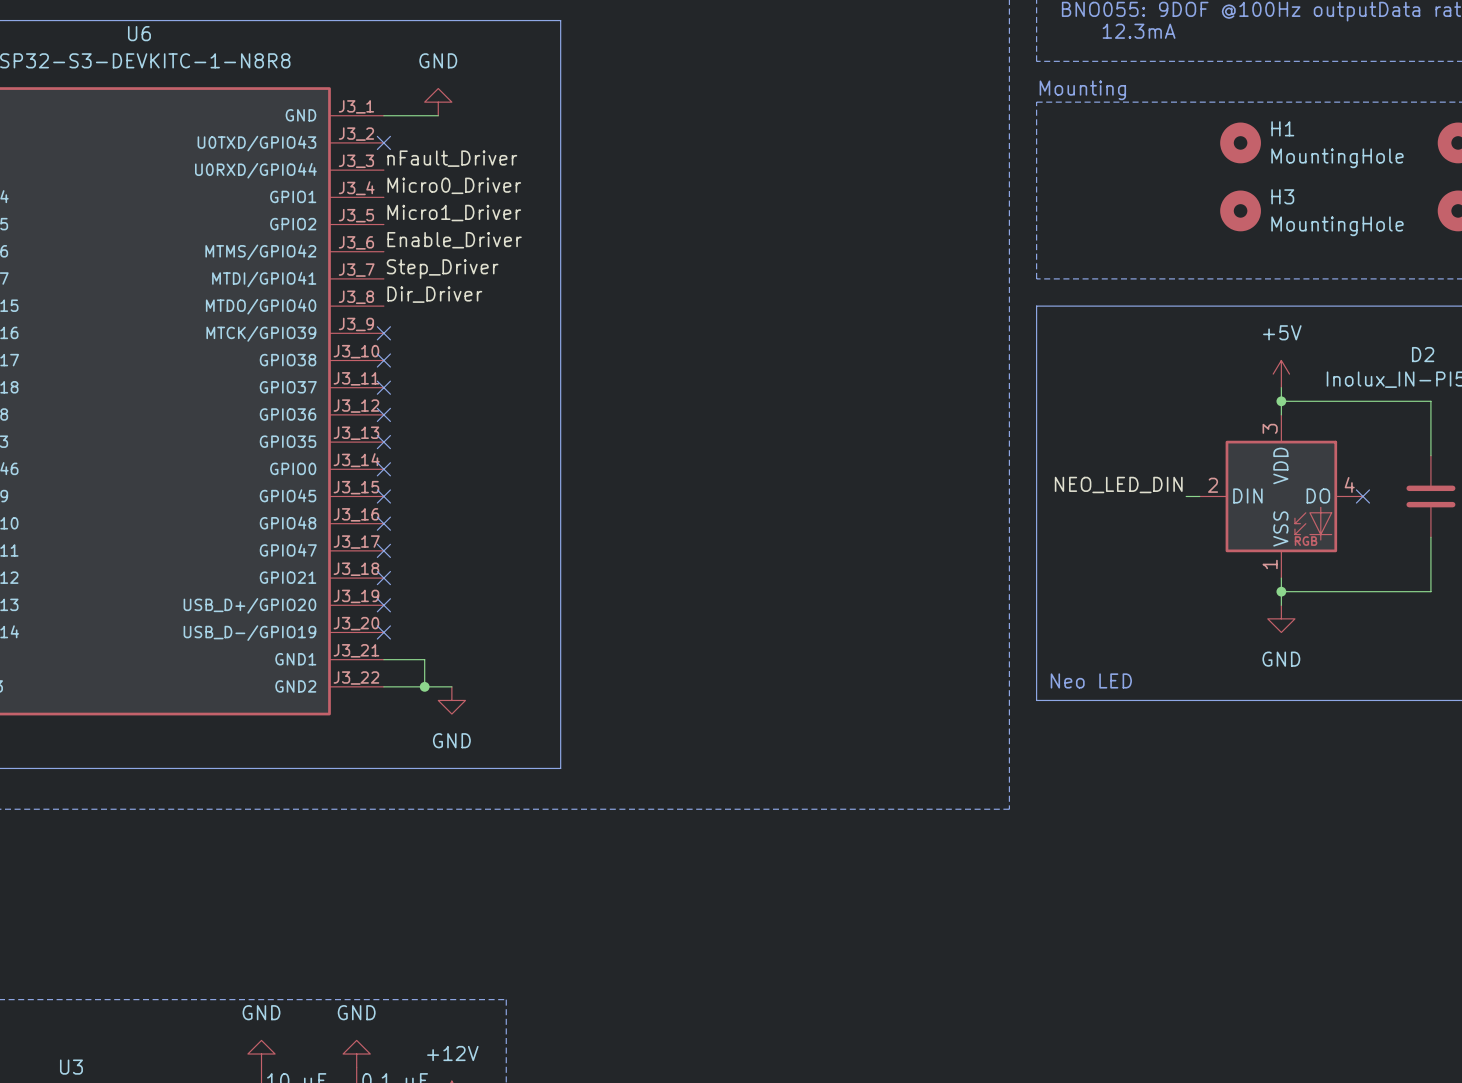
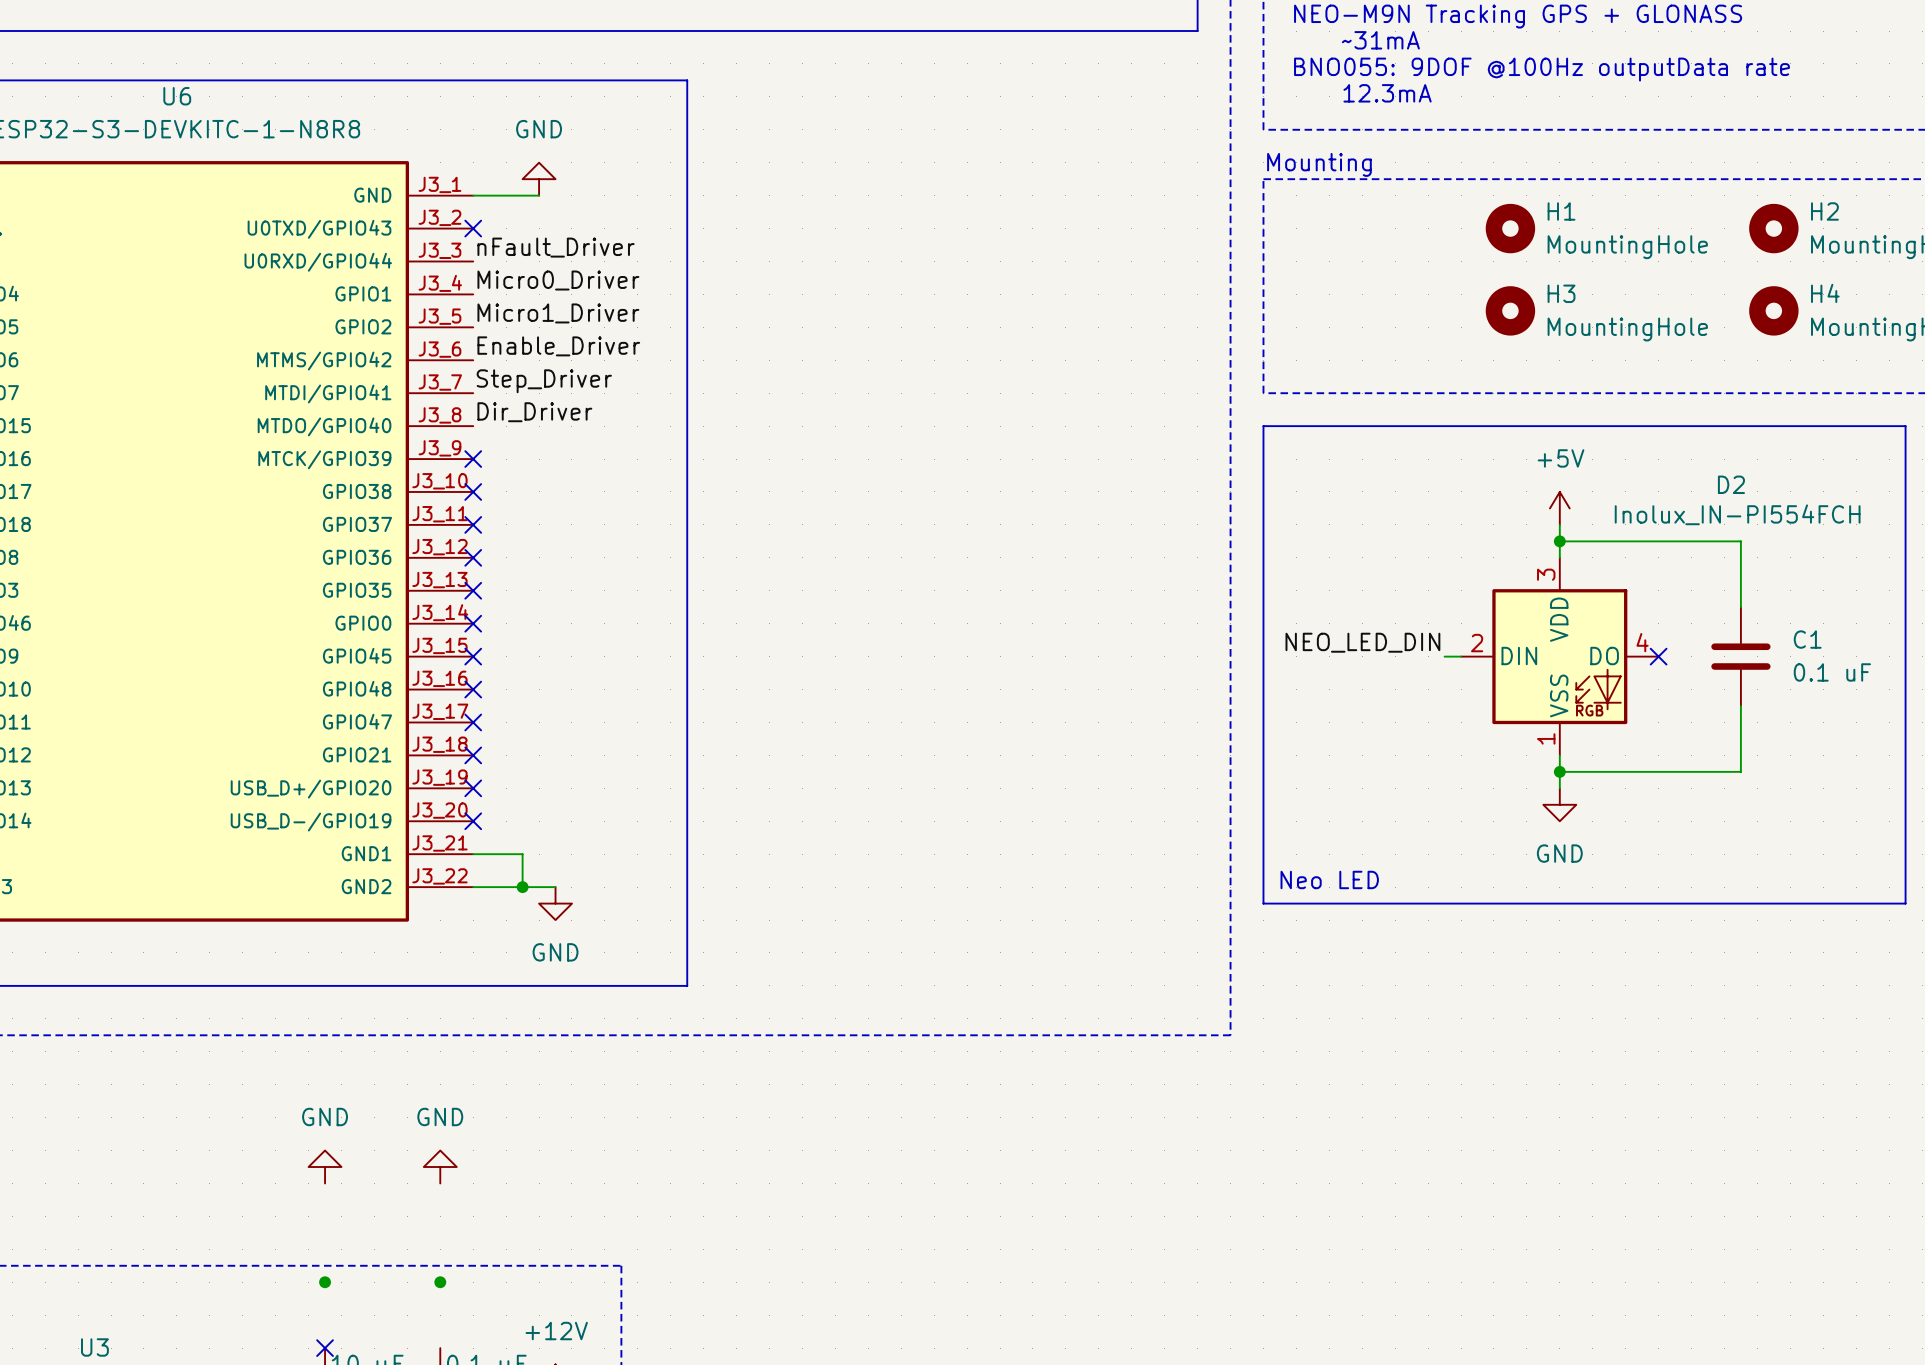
power symbol: none -> GND (325, 1167)
power symbol: none -> GND (440, 1167)
junction: none -> (325, 1282)
junction: none -> (440, 1282)
power symbol: GND (261, 1054) -> none
power symbol: GND (356, 1054) -> none
no-connect mark: none -> (325, 1348)

